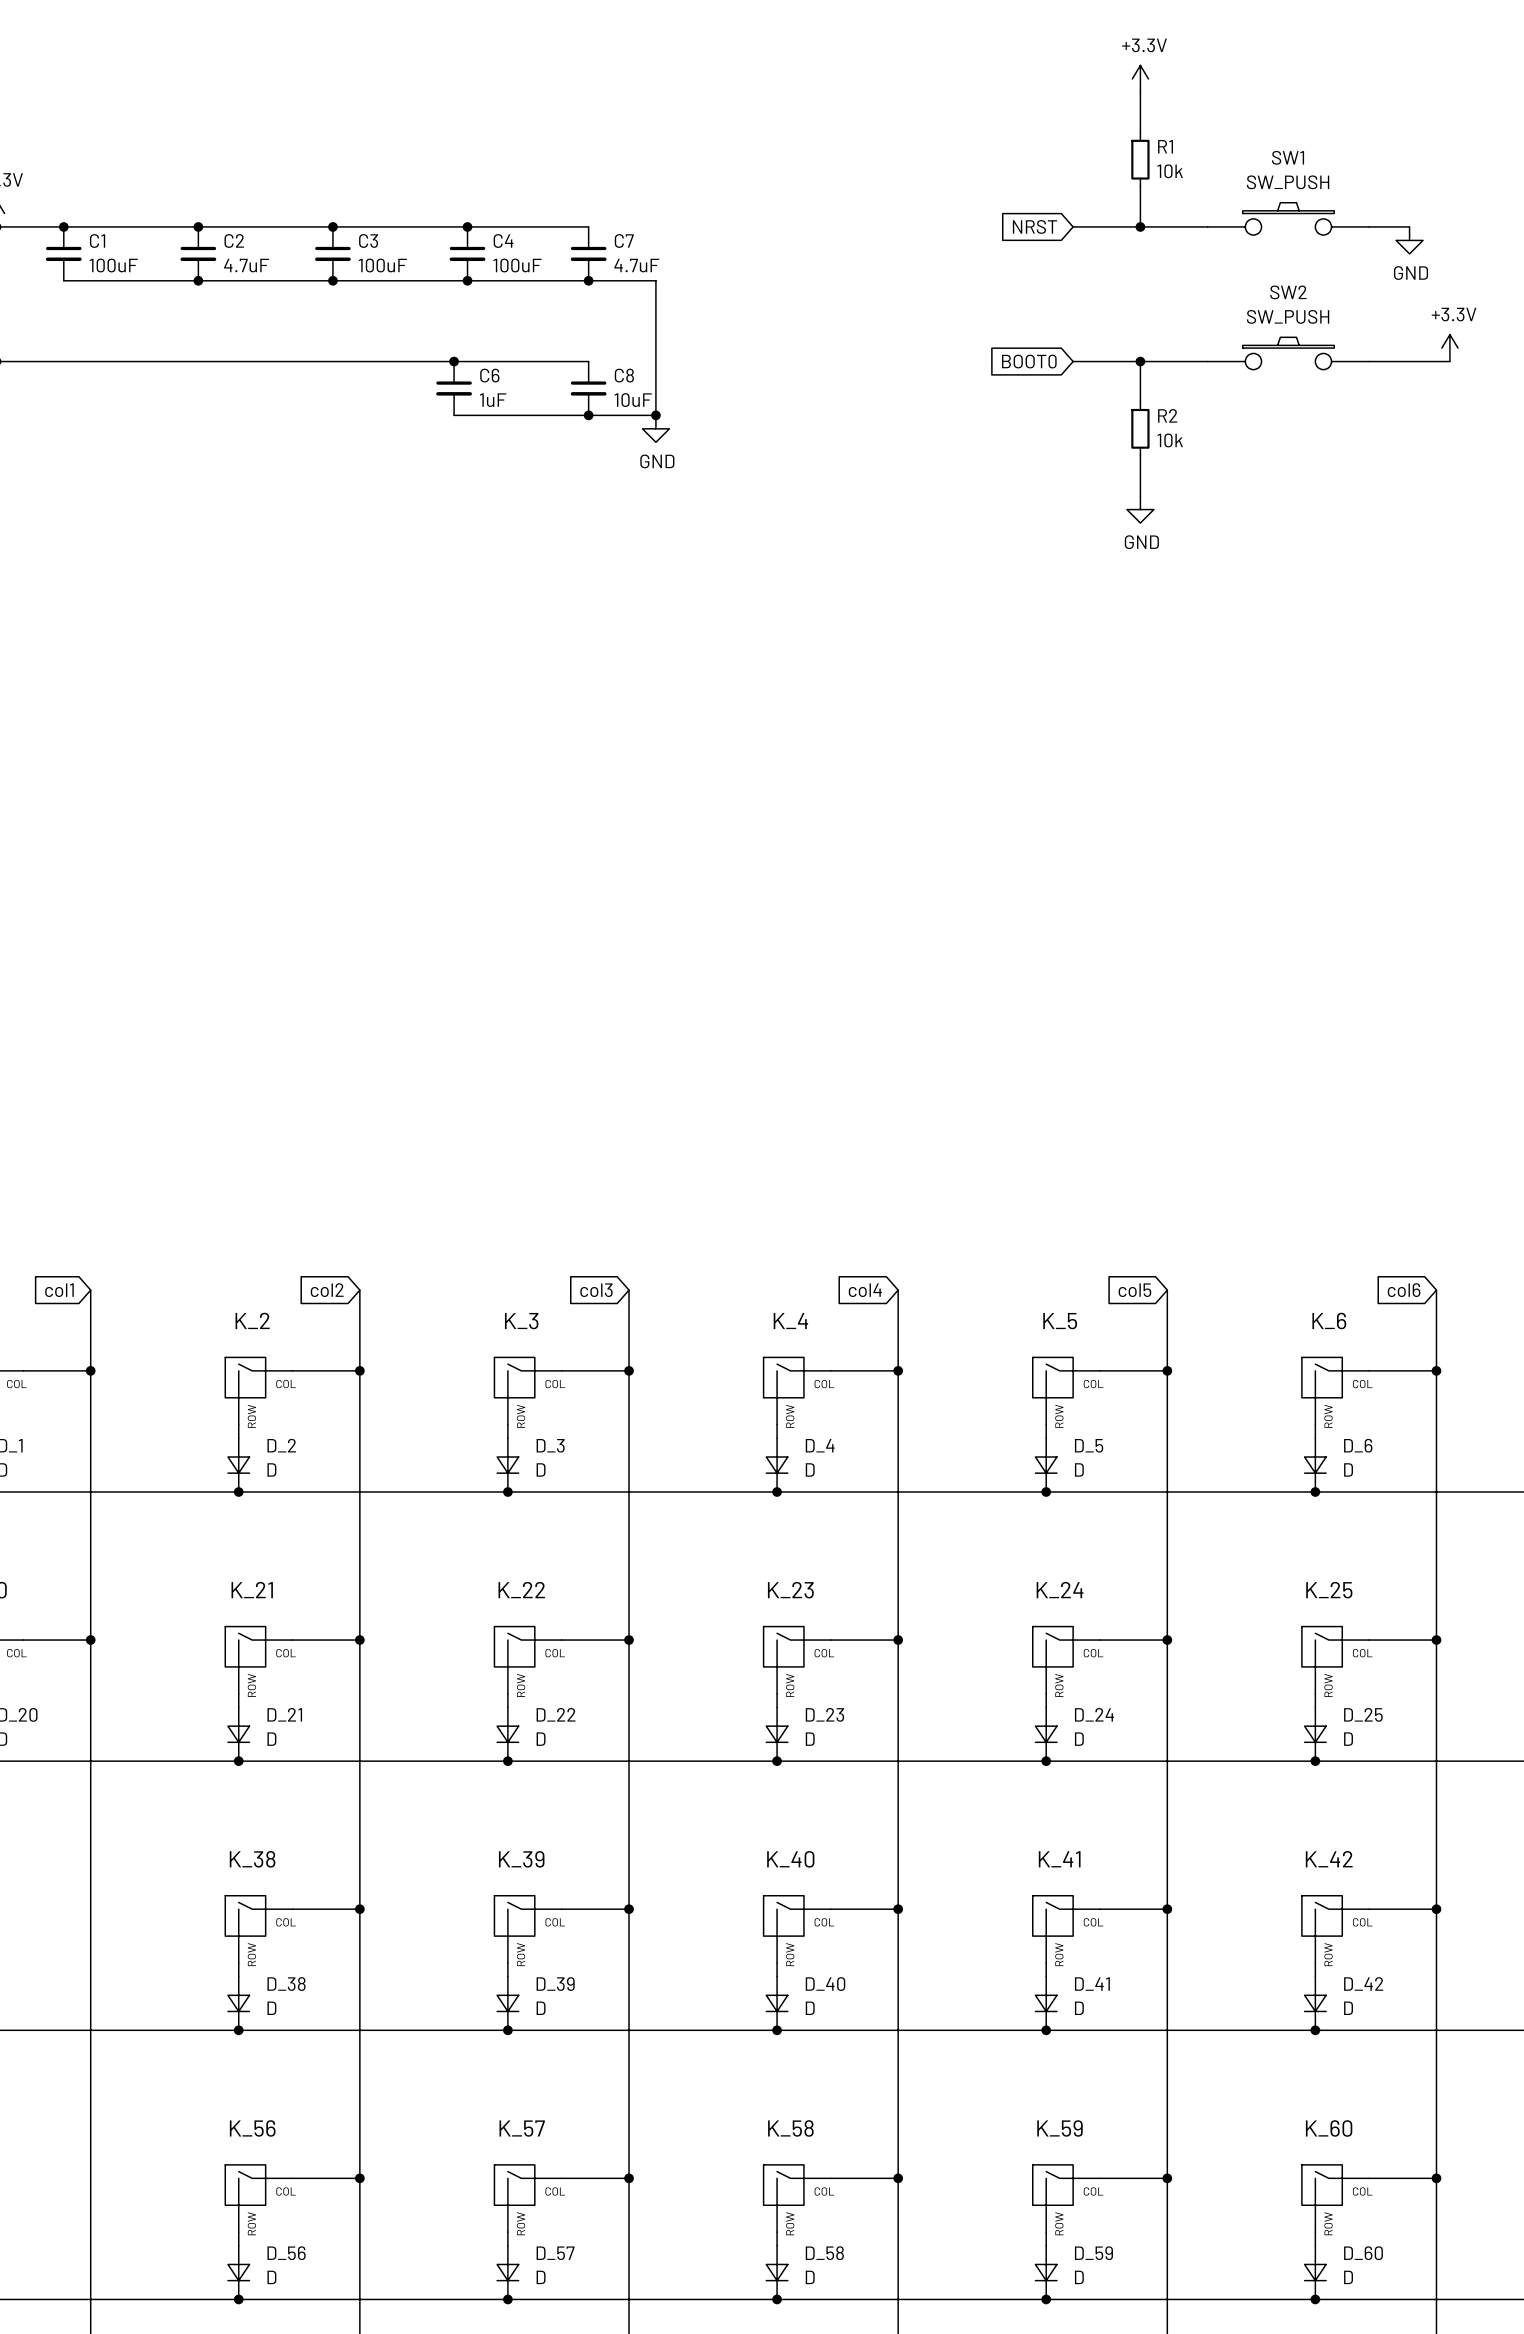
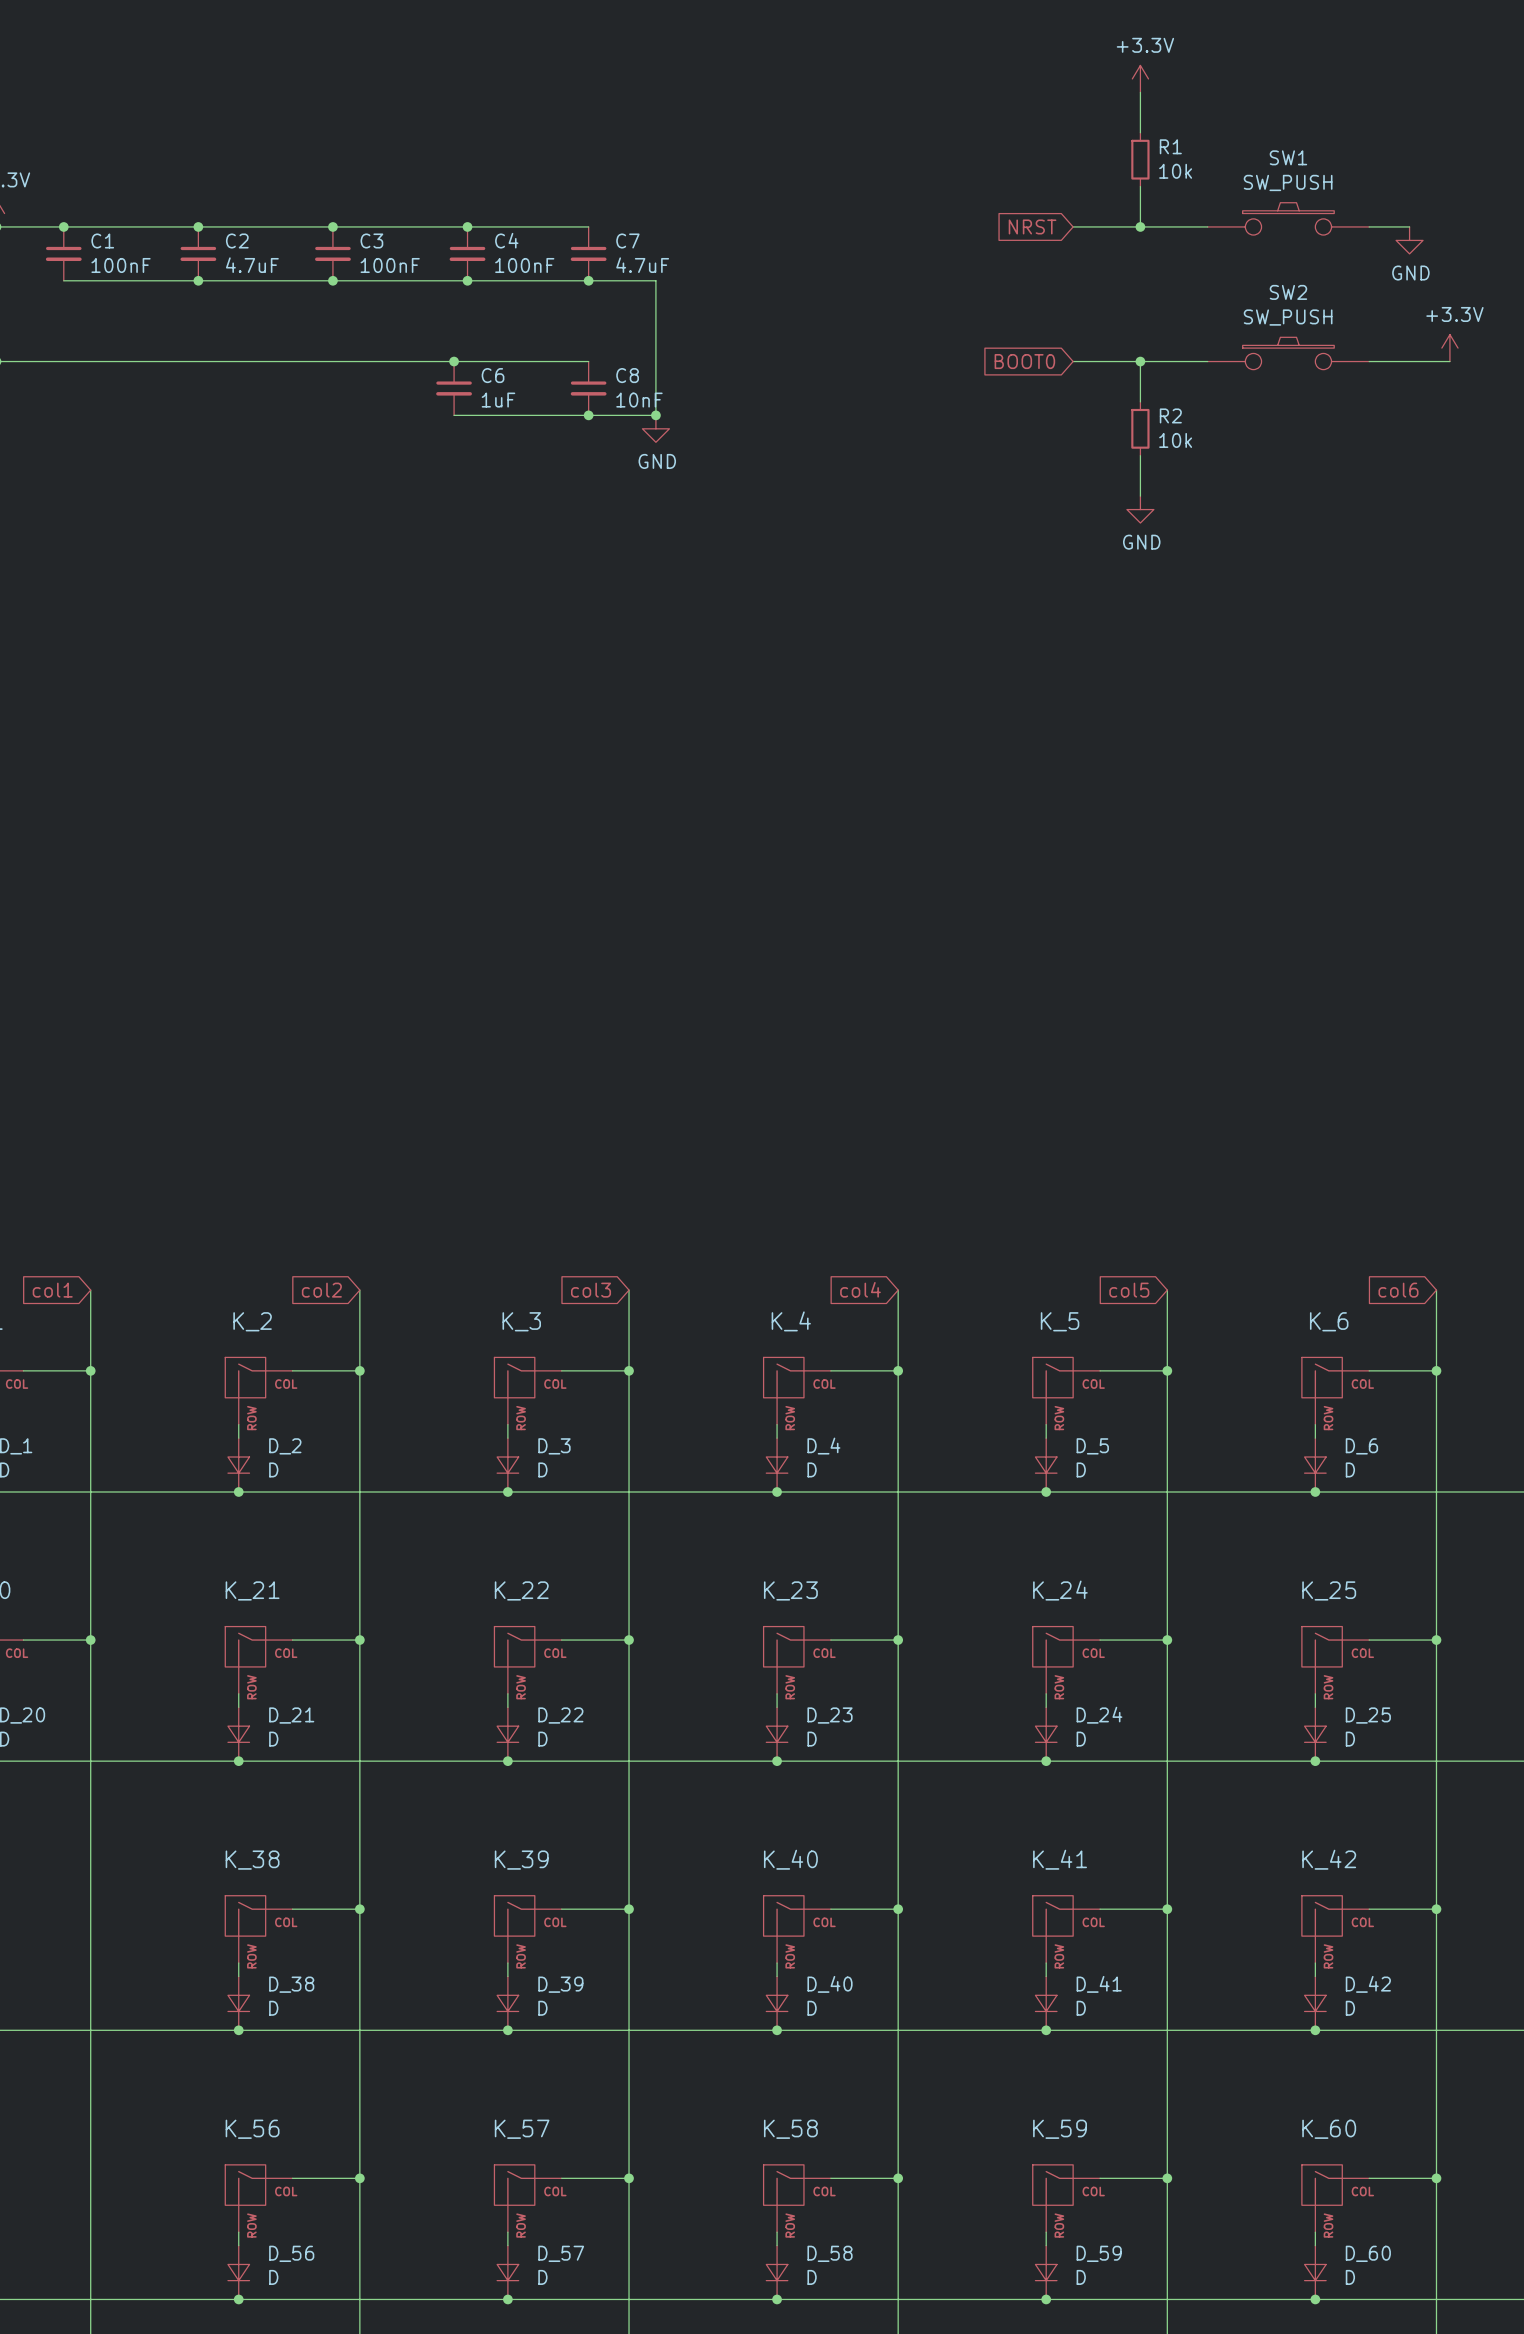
C1 value: 100uF (113, 265) -> 100nF (121, 265)
C3 value: 100uF (382, 265) -> 100nF (390, 265)
C4 value: 100uF (517, 265) -> 100nF (524, 265)
C8 value: 10uF (633, 400) -> 10nF (639, 400)

